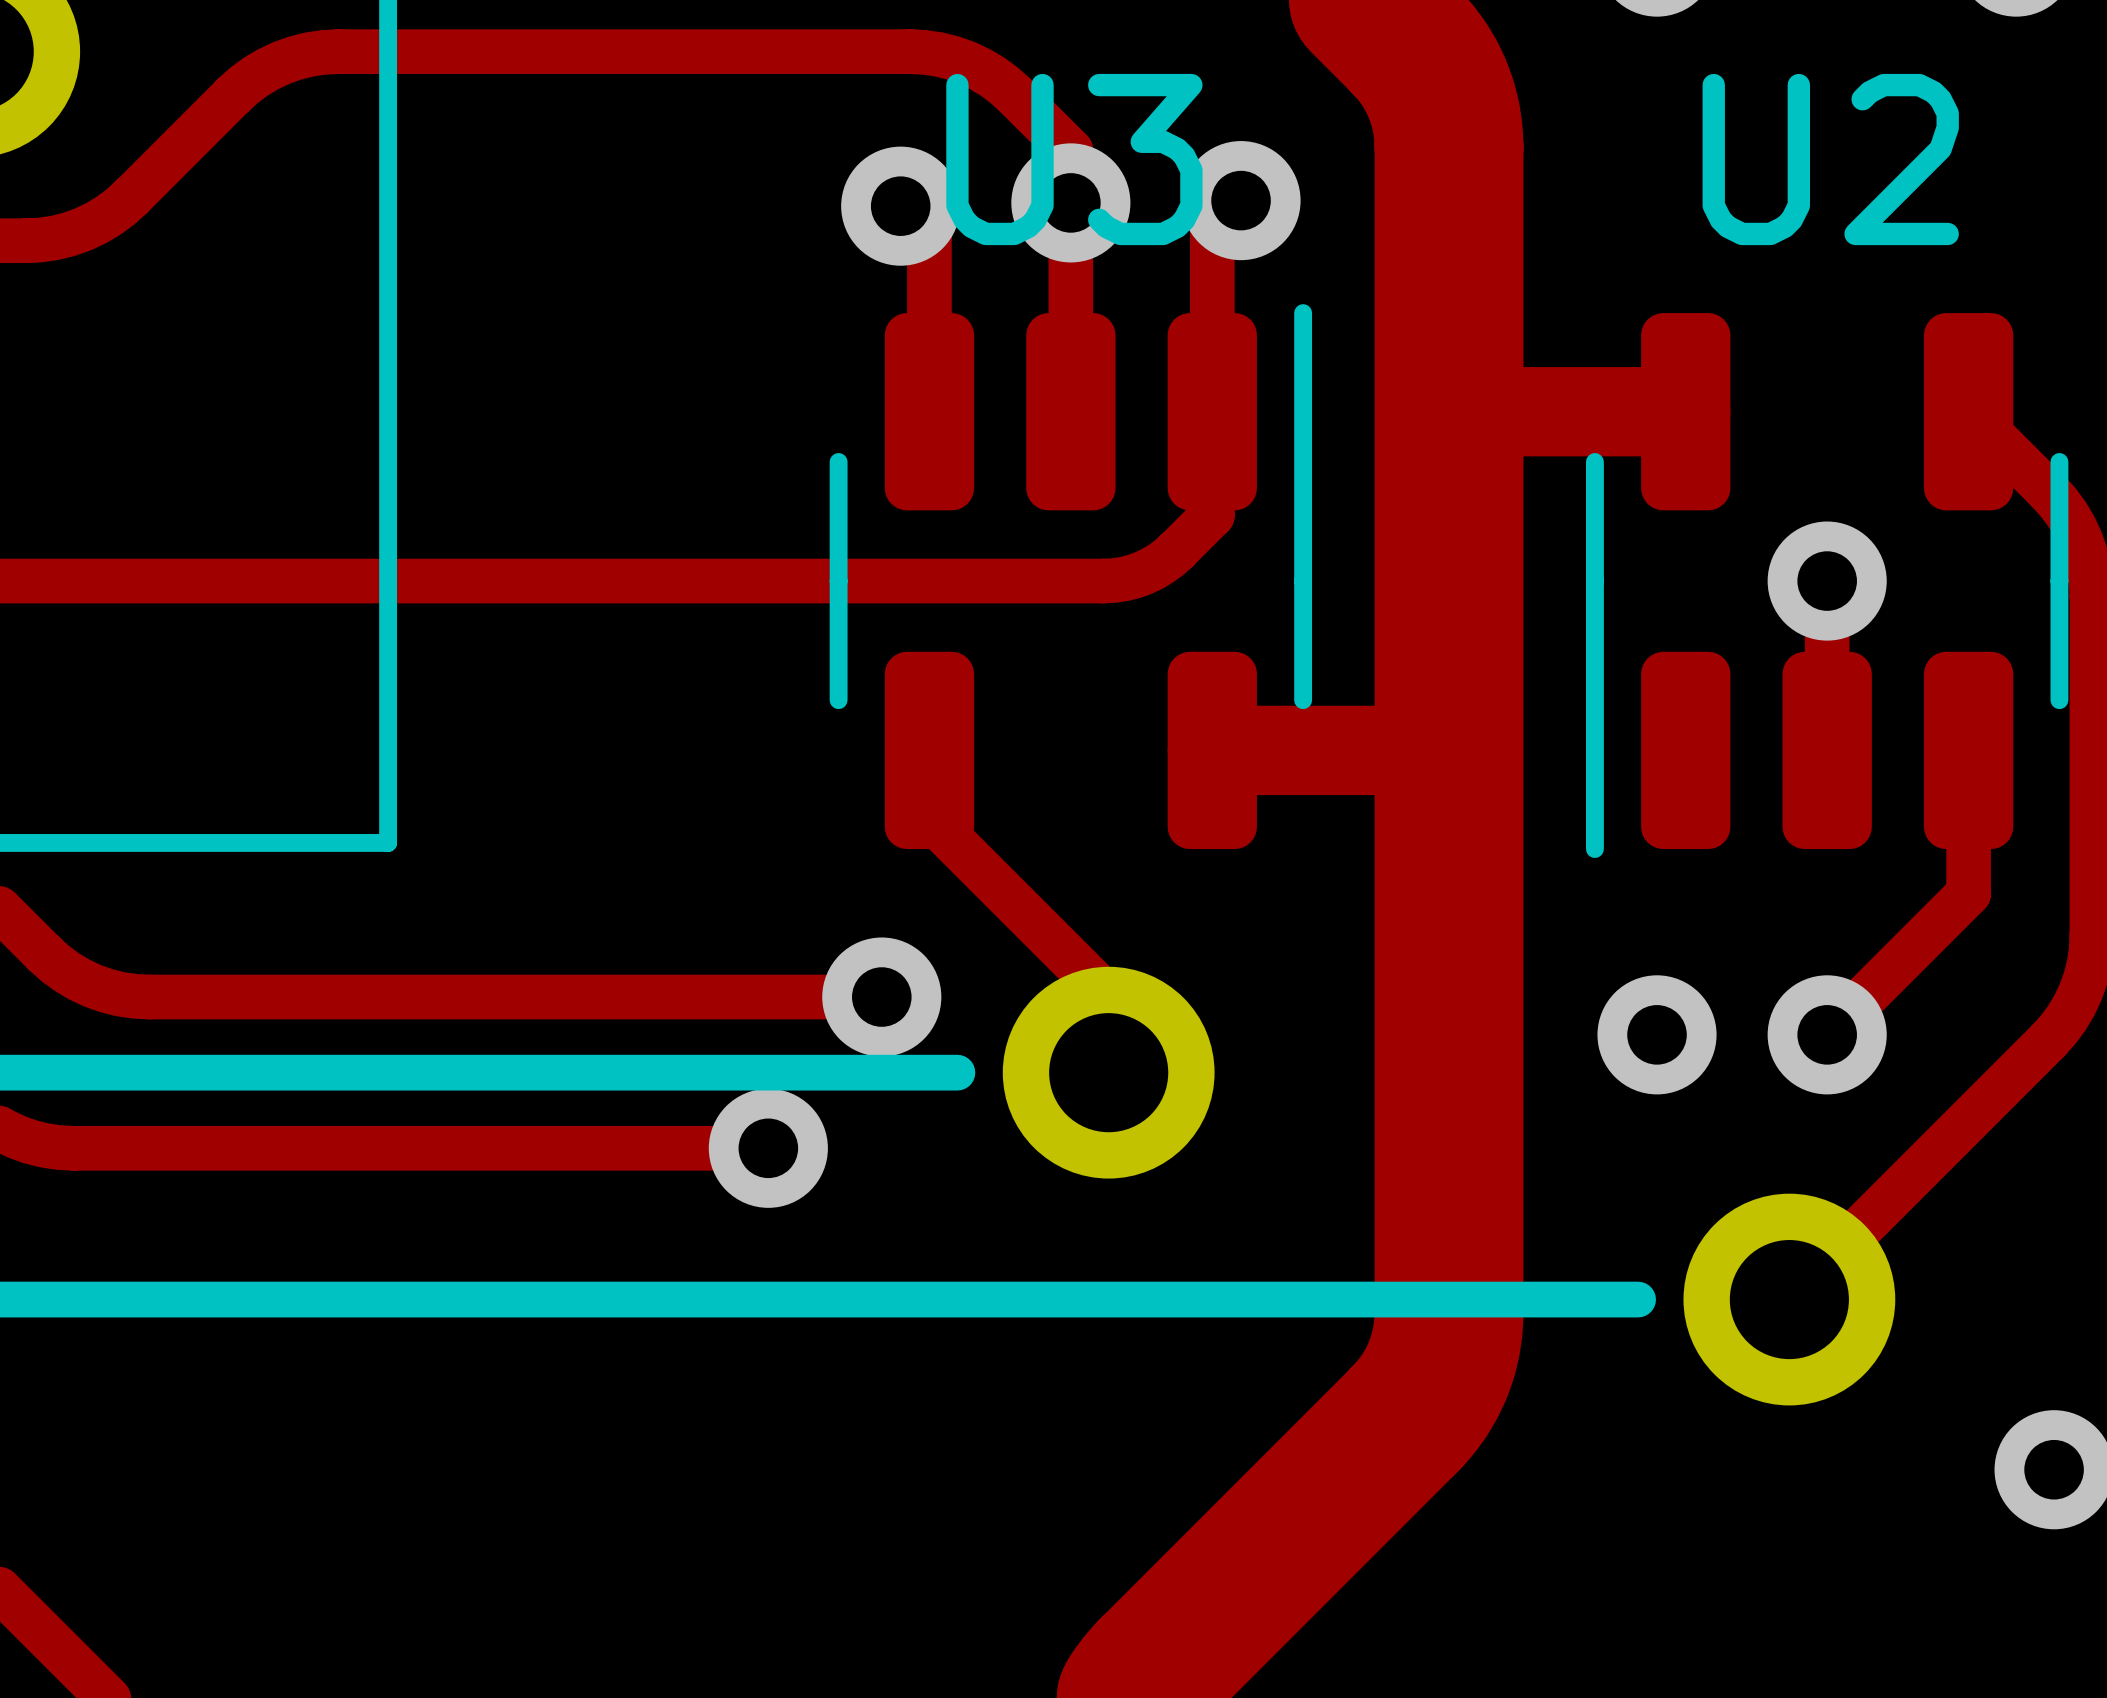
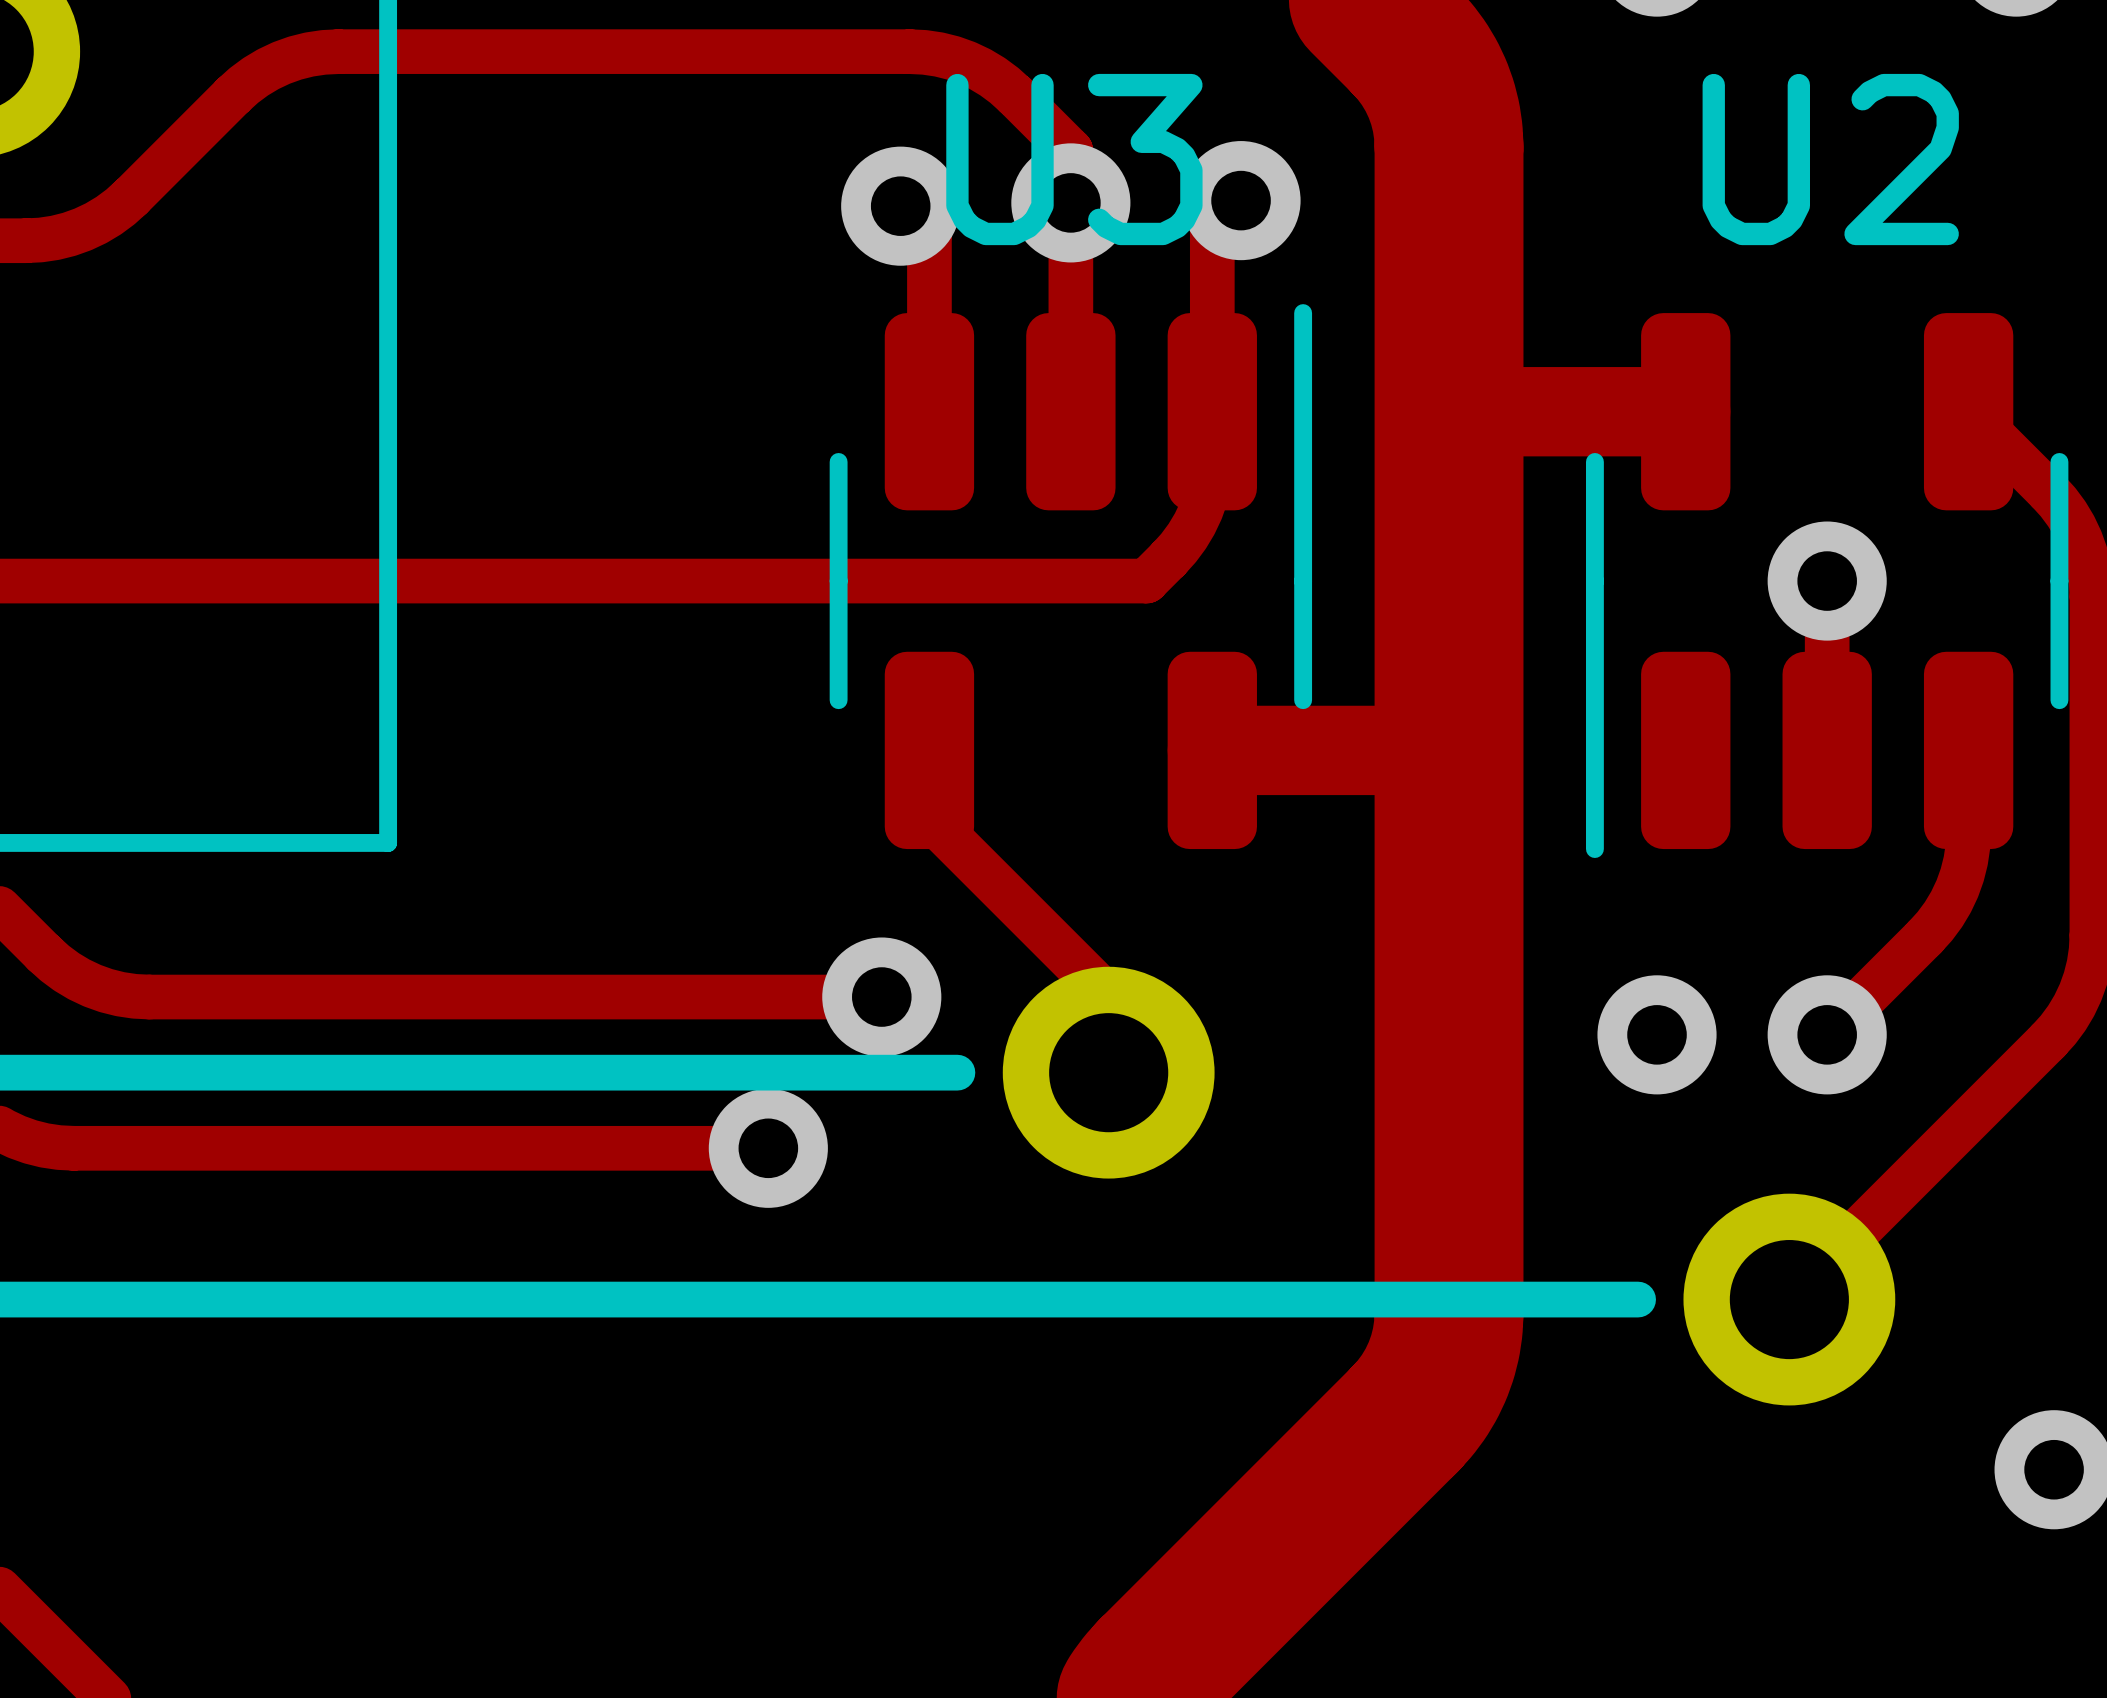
track: (1212, 453) (1212, 515) (1161, 563) (1133, 576) (1103, 581) -> (1212, 453) (1205, 496) (1194, 523) (1178, 548) (1146, 581) (1103, 581)
track: (1968, 831) (1968, 893) (1925, 937) -> (1968, 831) (1965, 860) (1957, 888) (1943, 914) (1925, 937)

